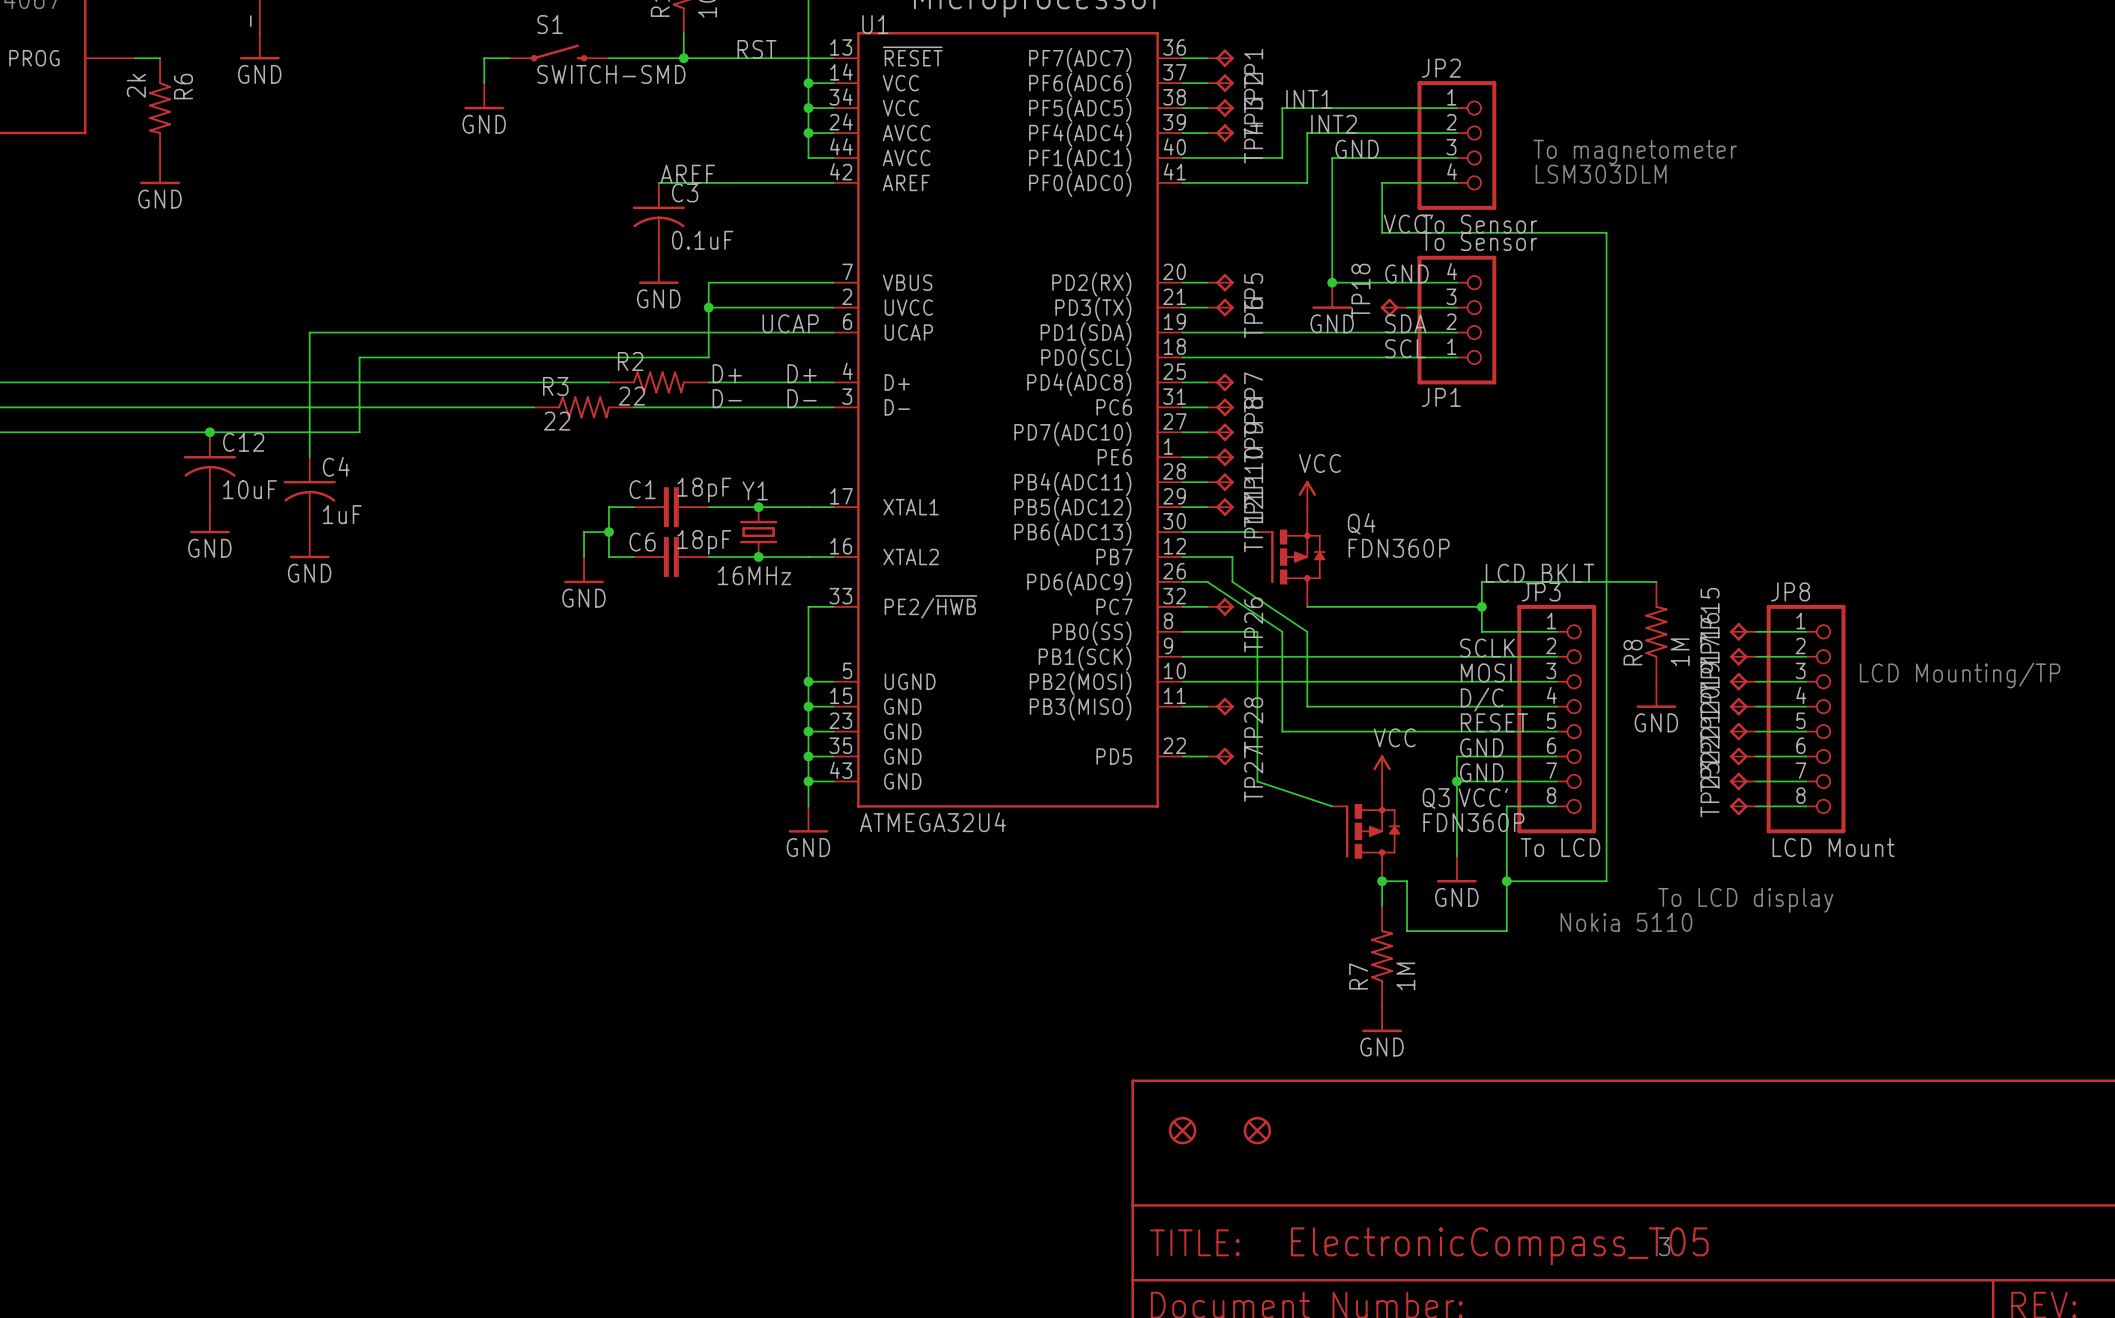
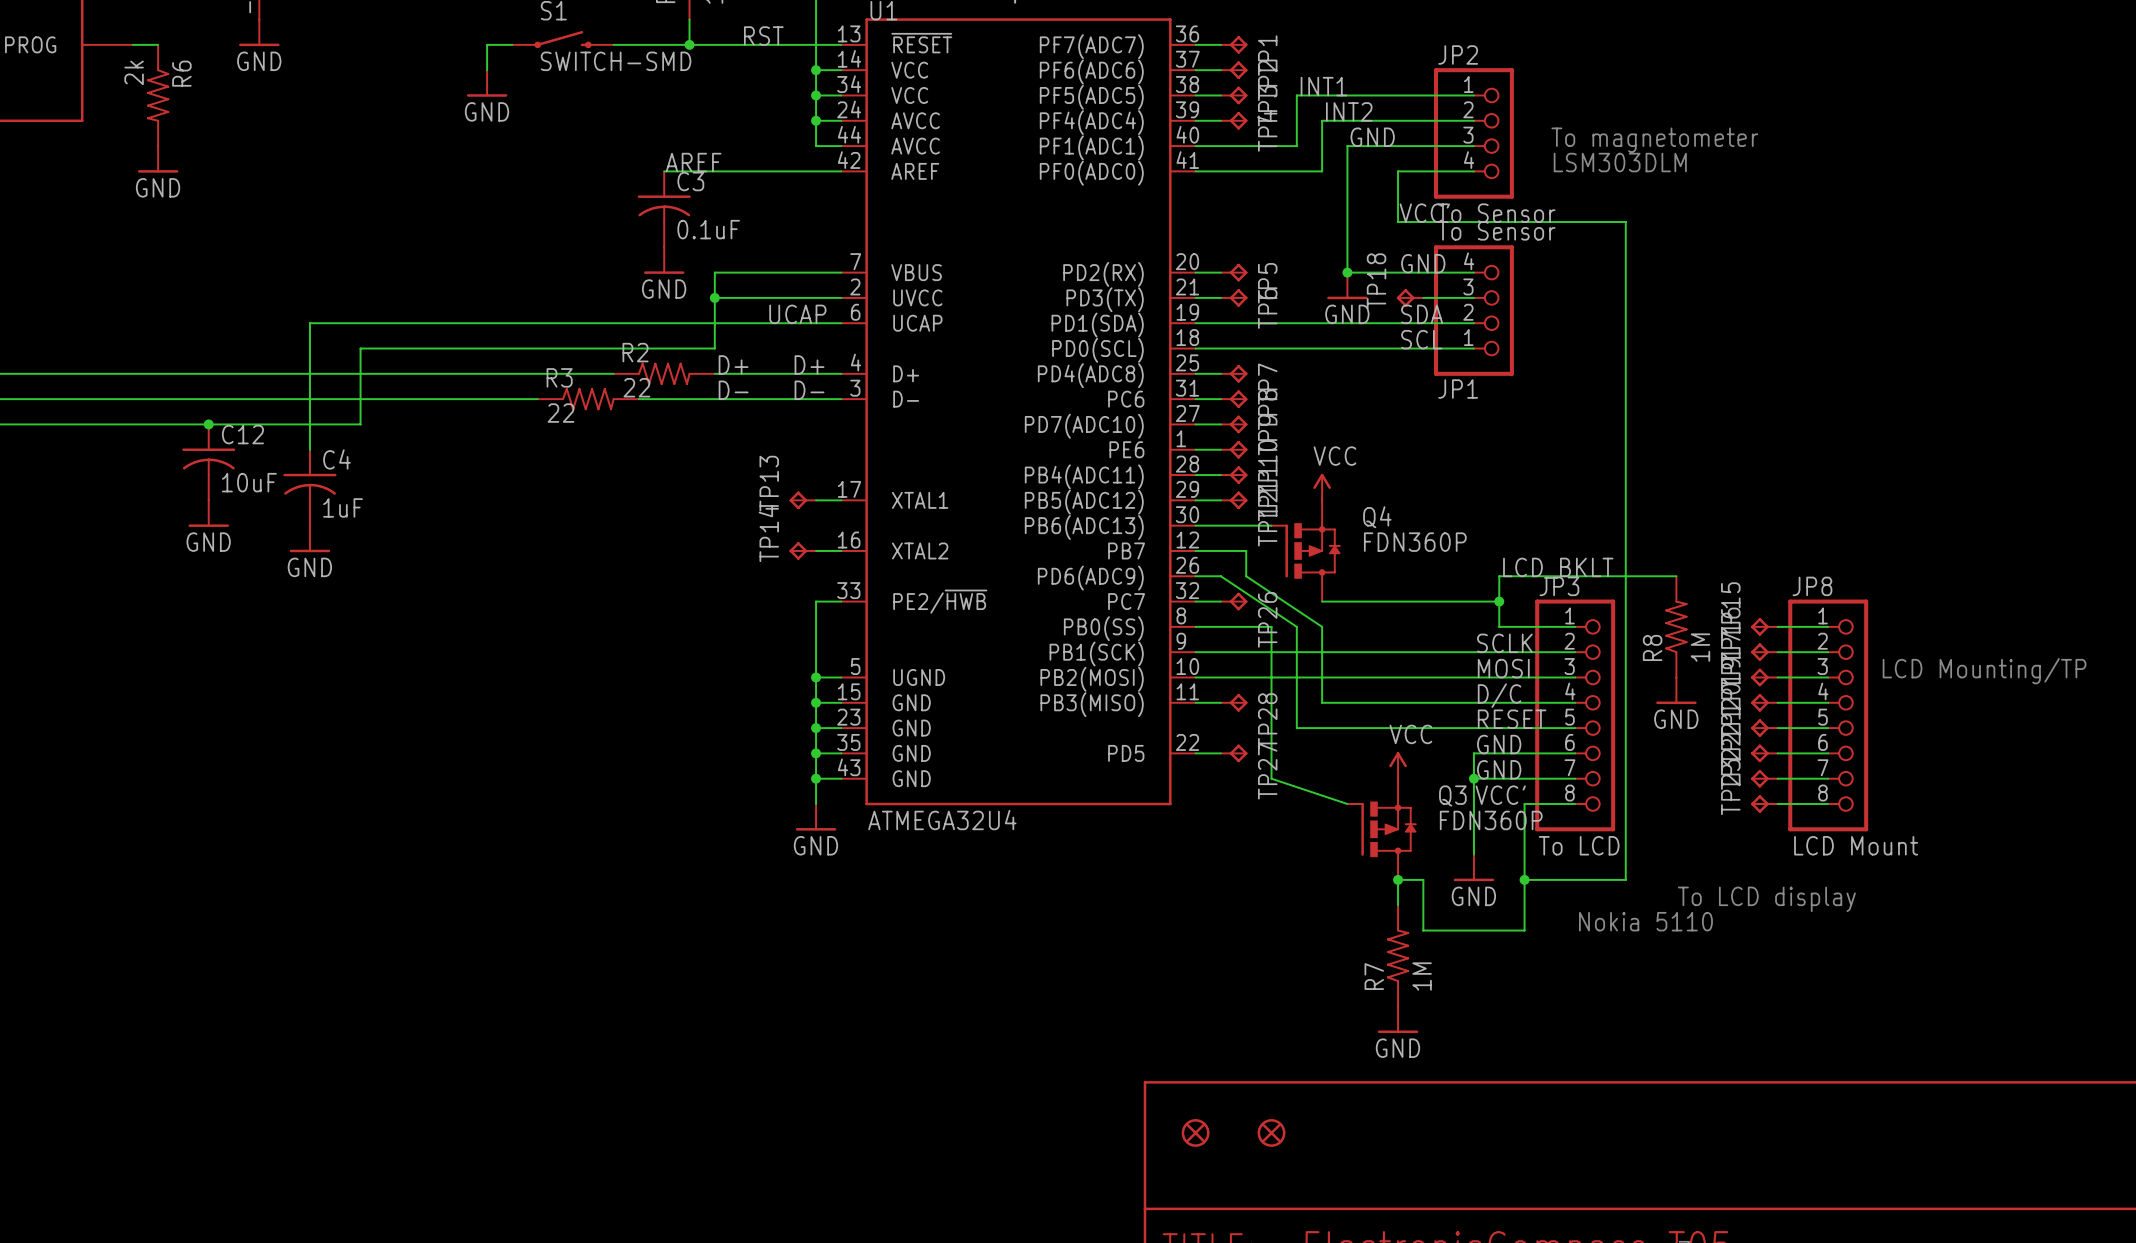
wire: (633, 507) (608, 507) (608, 557) (633, 557) -> none
C1: 18pF (671, 507) -> none
wire: (708, 507) (808, 507) -> none
junction: (758, 507) -> none
TP13: none -> (802, 500)
wire: (608, 532) (584, 532) (584, 557) -> none
junction: (608, 532) -> none
Y1: 16MHz (758, 532) -> none
C6: 18pF (671, 557) -> none
wire: (708, 557) (808, 557) -> none
junction: (758, 557) -> none
TP14: none -> (802, 550)
power symbol: GND (584, 570) -> none

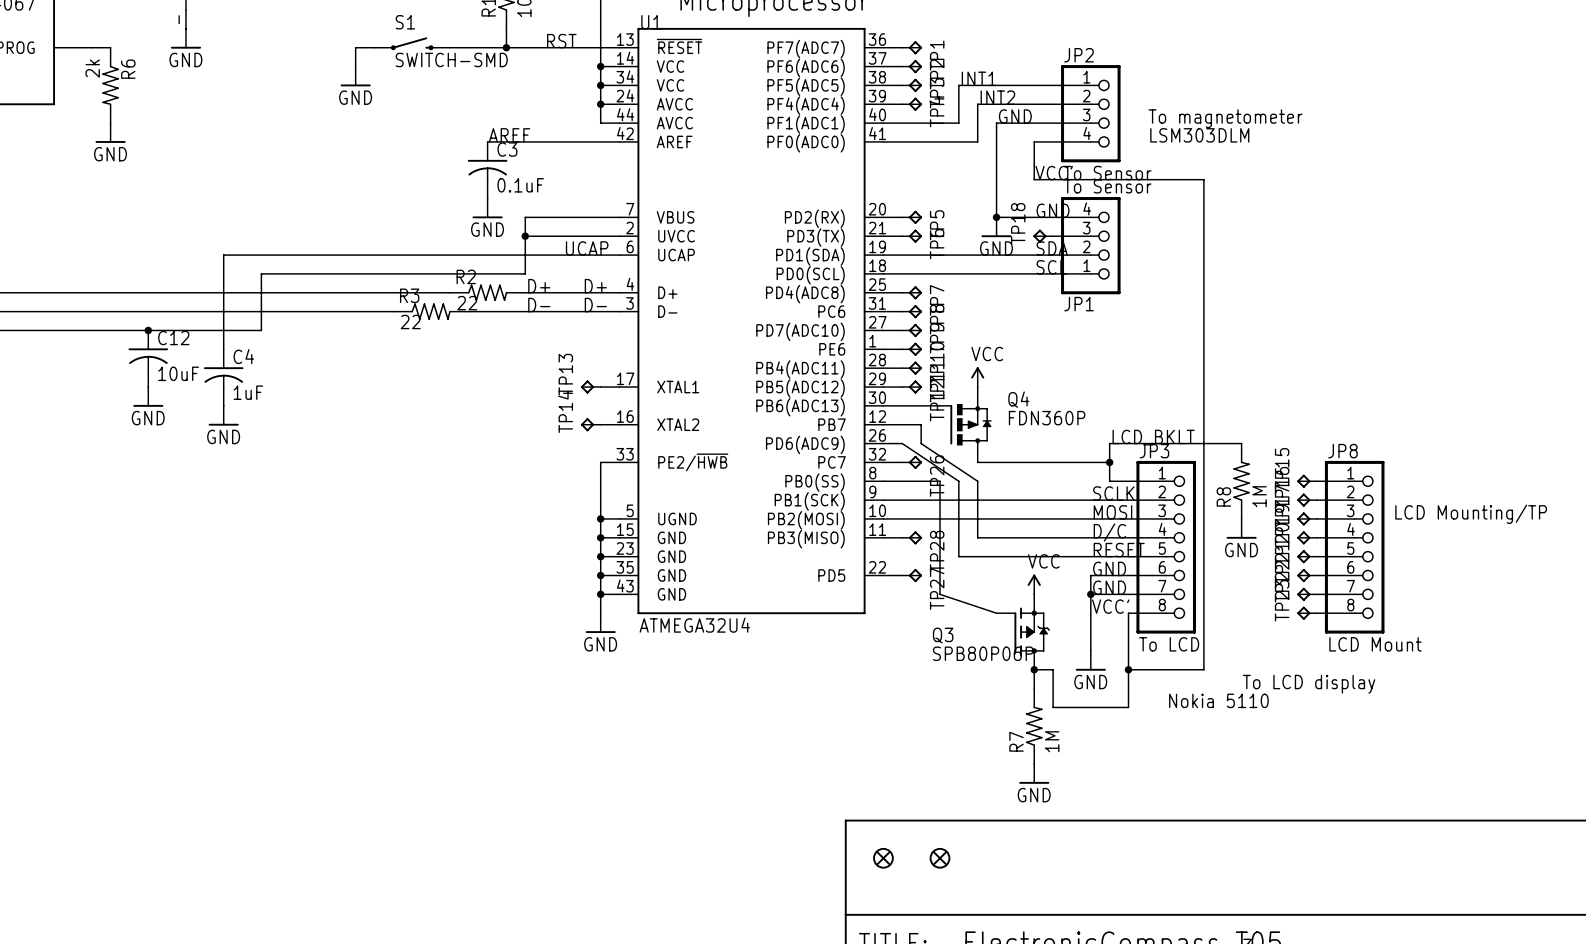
Q3 symbol: [1346, 778, 1417, 880] -> [996, 594, 1050, 670]
Q3 name position: Q3 (1452, 795) -> Q3 (943, 635)
Q3 value: FDN360P (1491, 820) -> SPB80P06P (983, 653)

